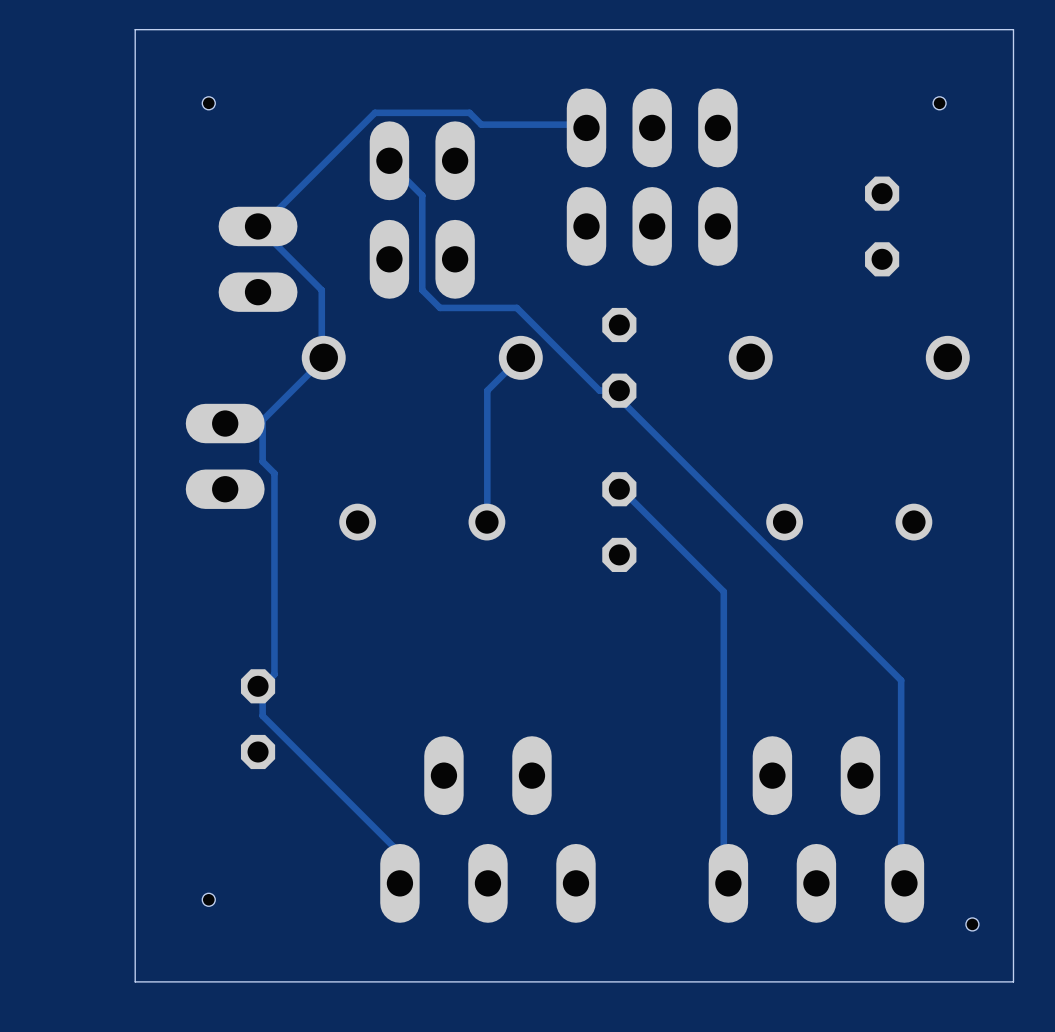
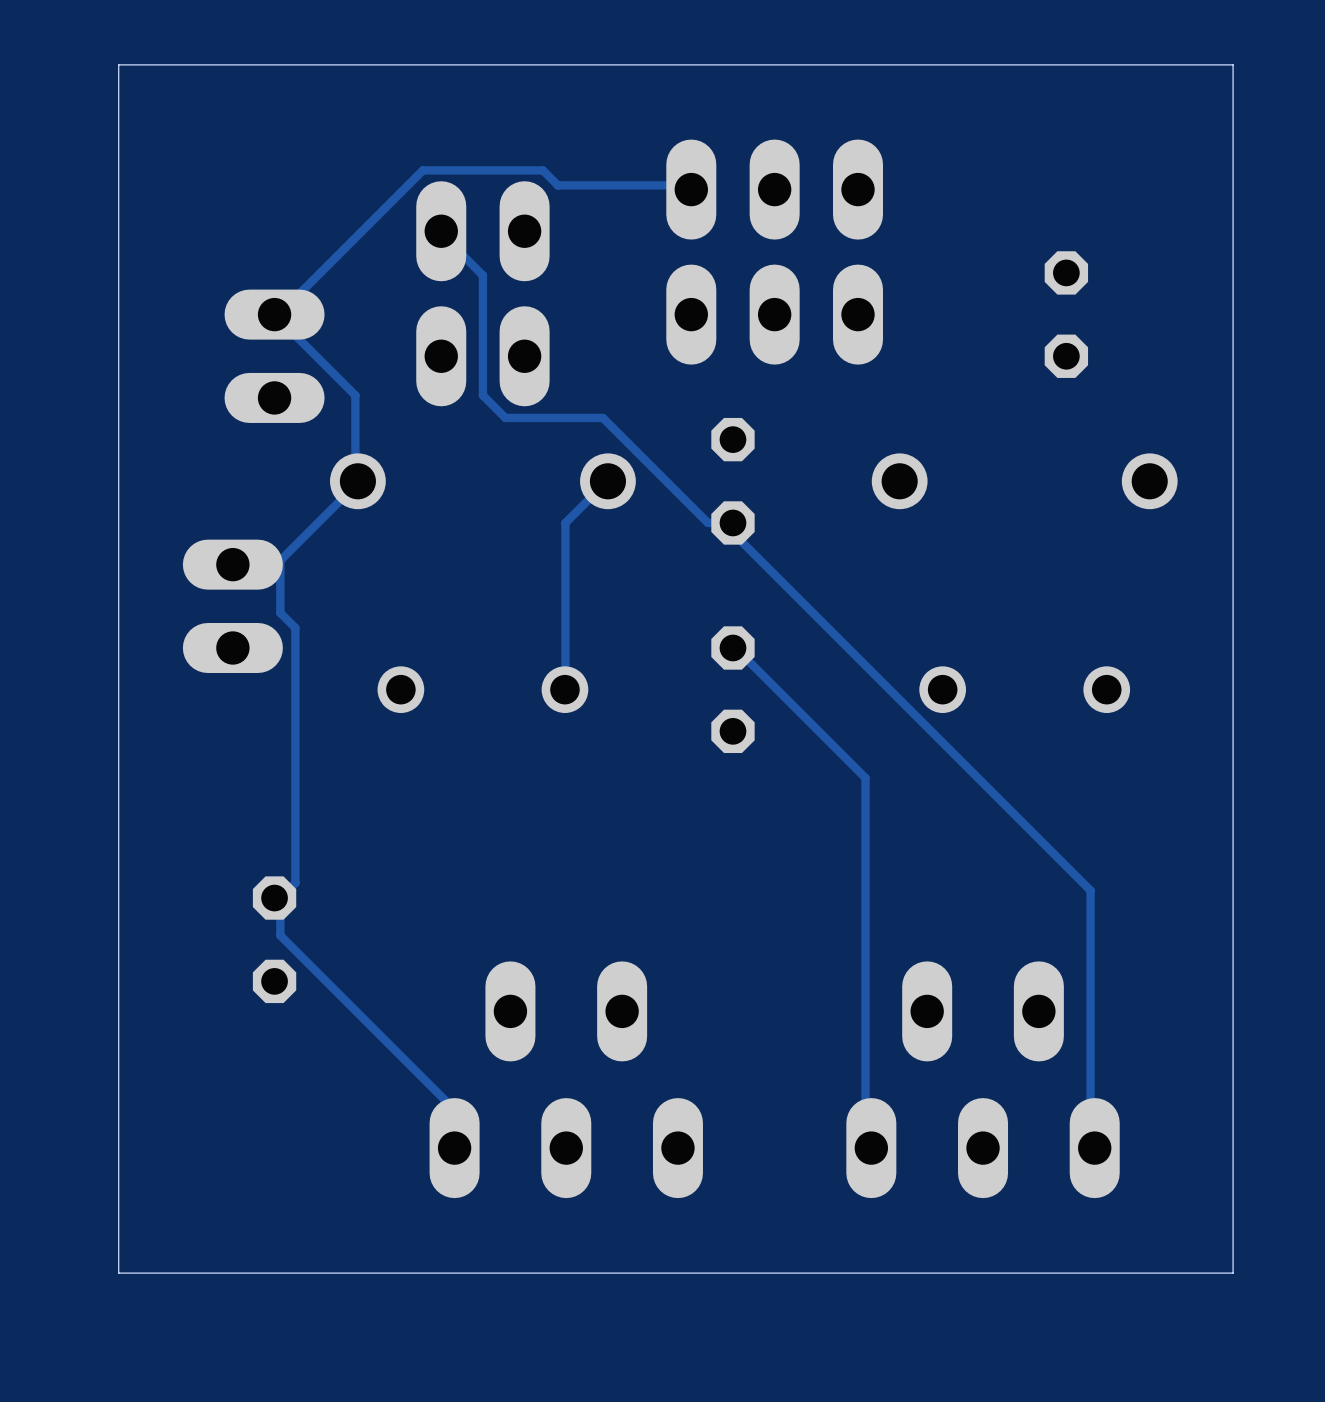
hole: (208, 103) -> none
hole: (939, 103) -> none
hole: (208, 899) -> none
hole: (972, 924) -> none

